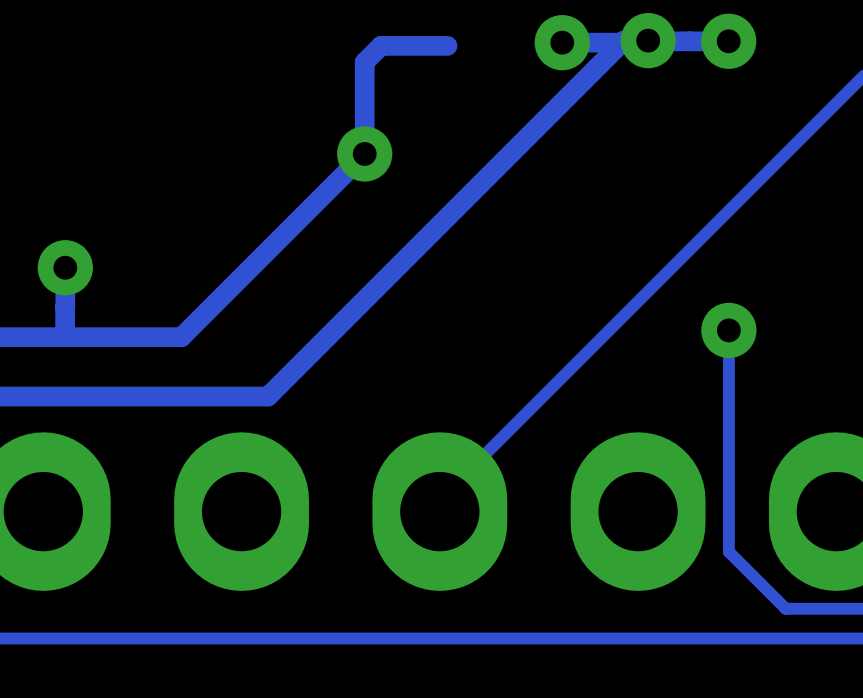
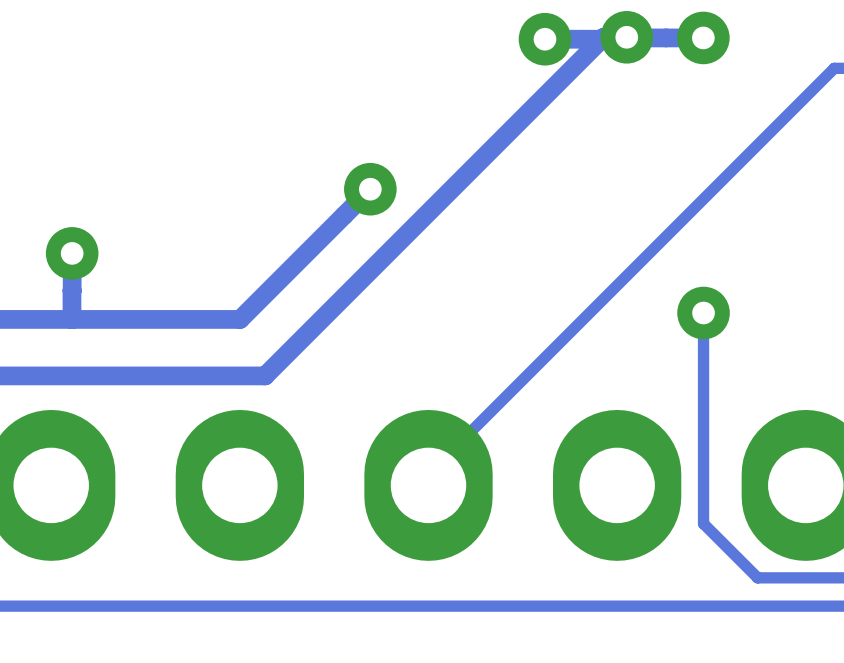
track: (447, 45) (381, 45) (364, 62) (364, 153) (181, 337) -> (370, 189) (240, 319) (182, 319)
via position: (364, 153) -> (370, 189)

